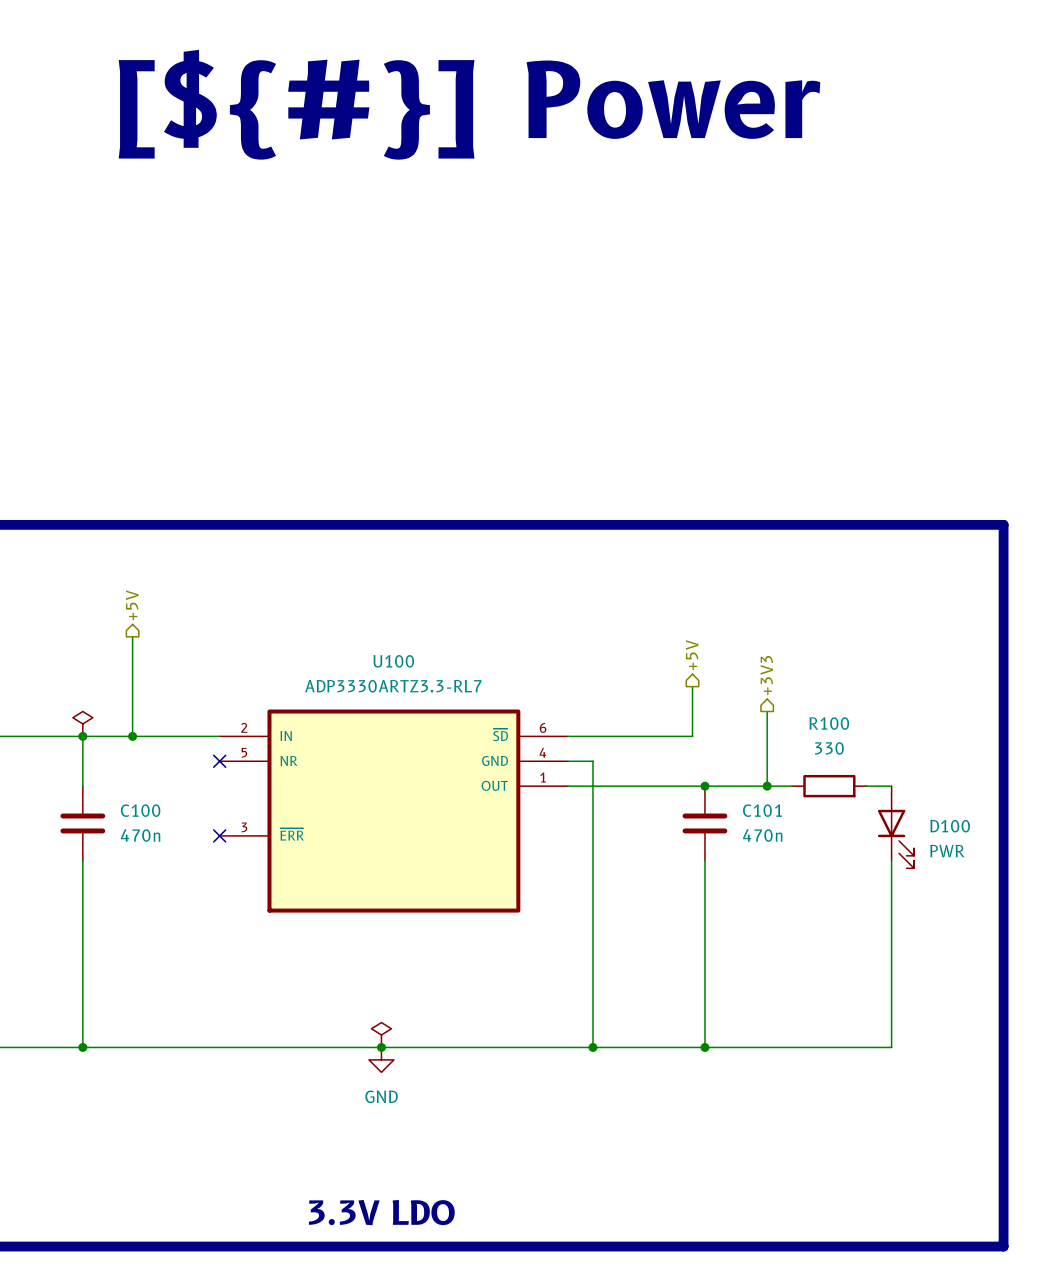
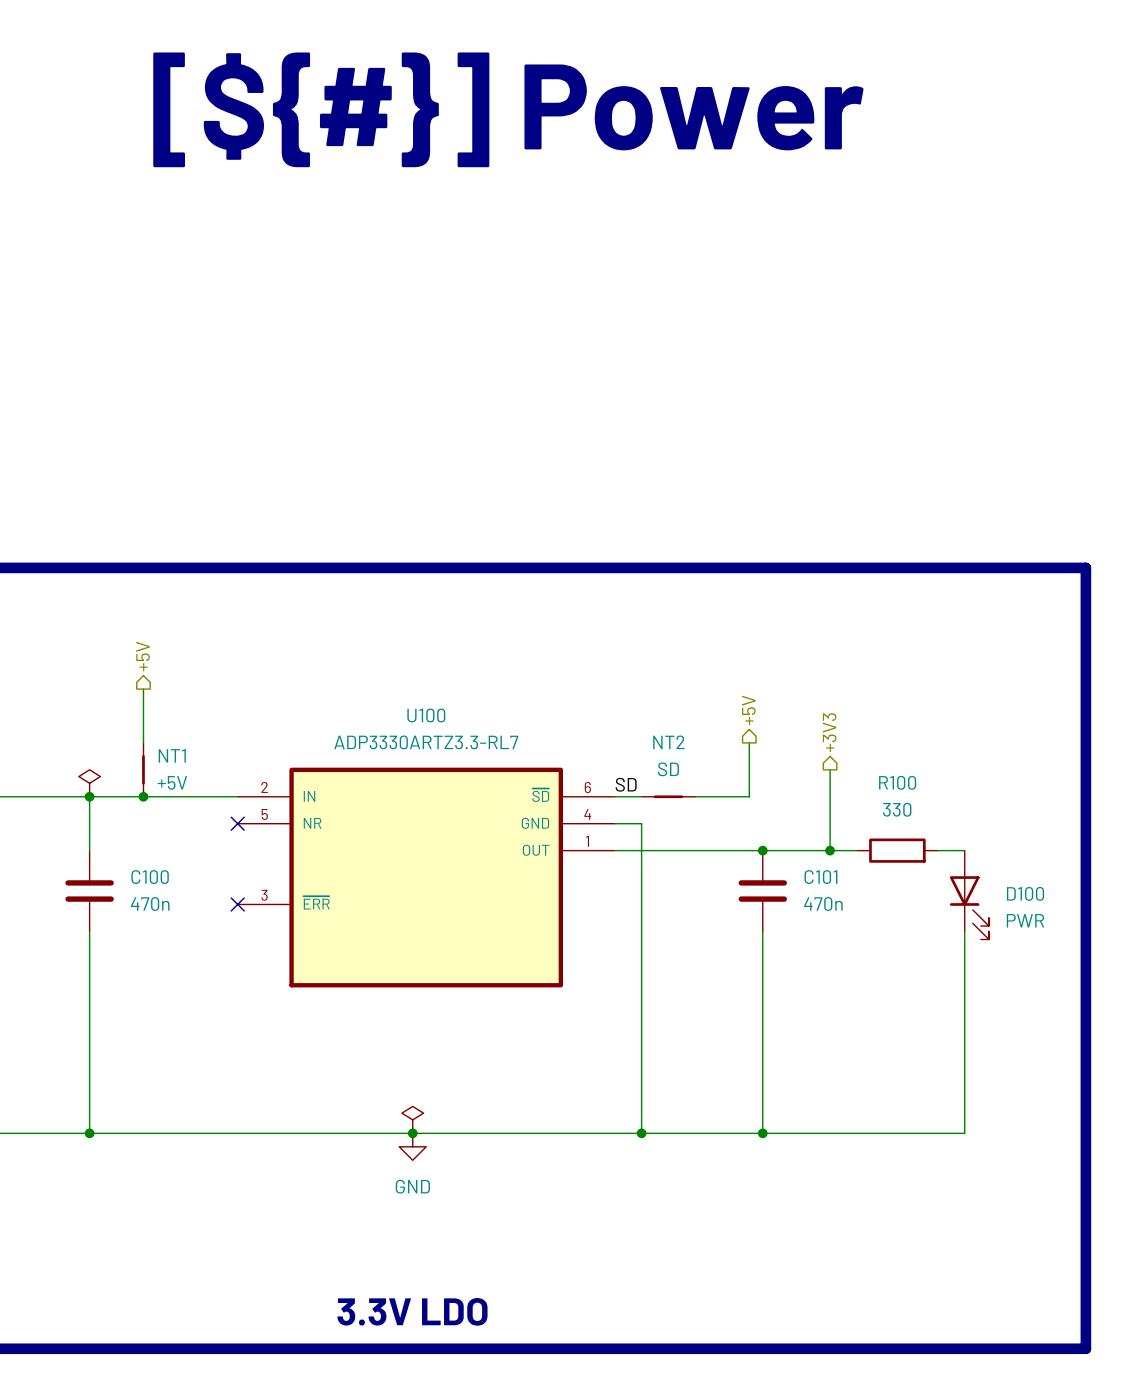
NT1: none -> +5V (143, 769)
label: none -> SD (626, 784)
NT2: none -> SD (668, 796)

